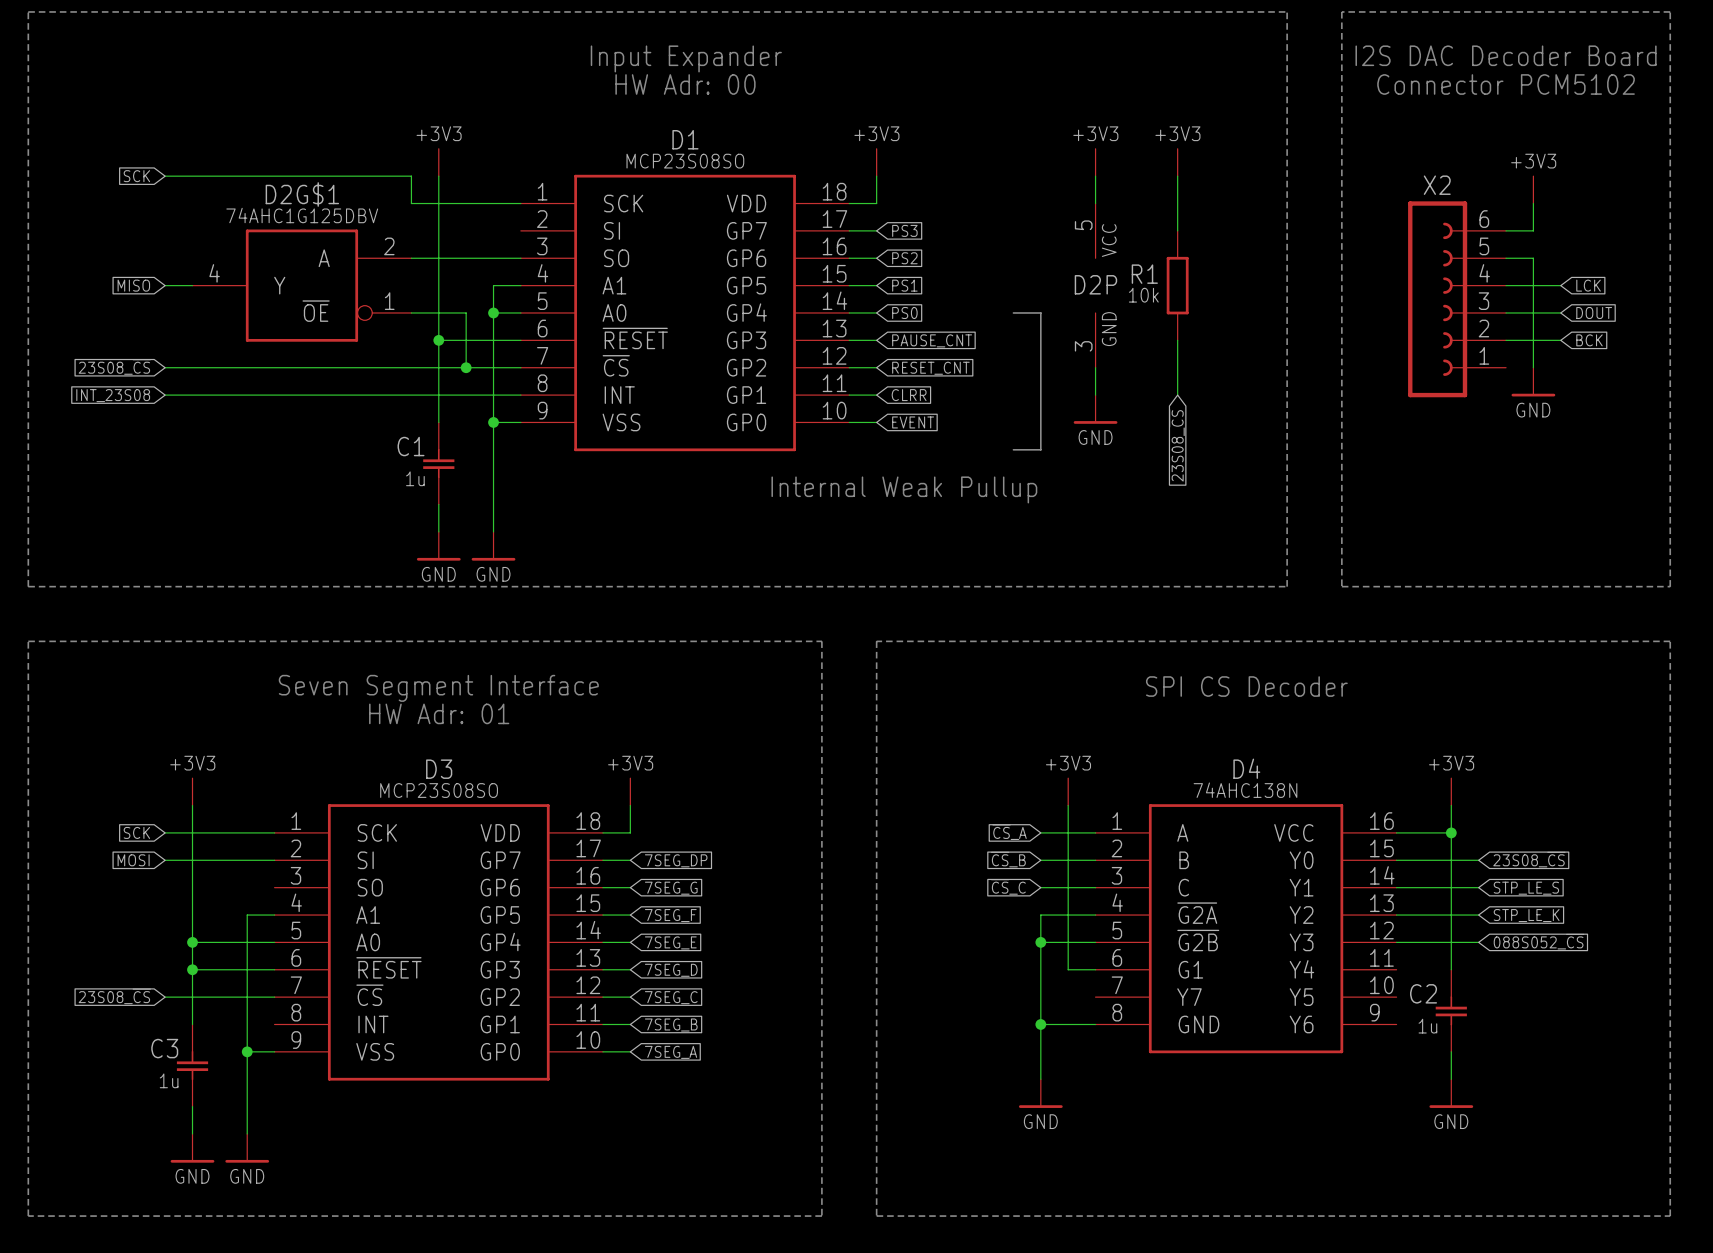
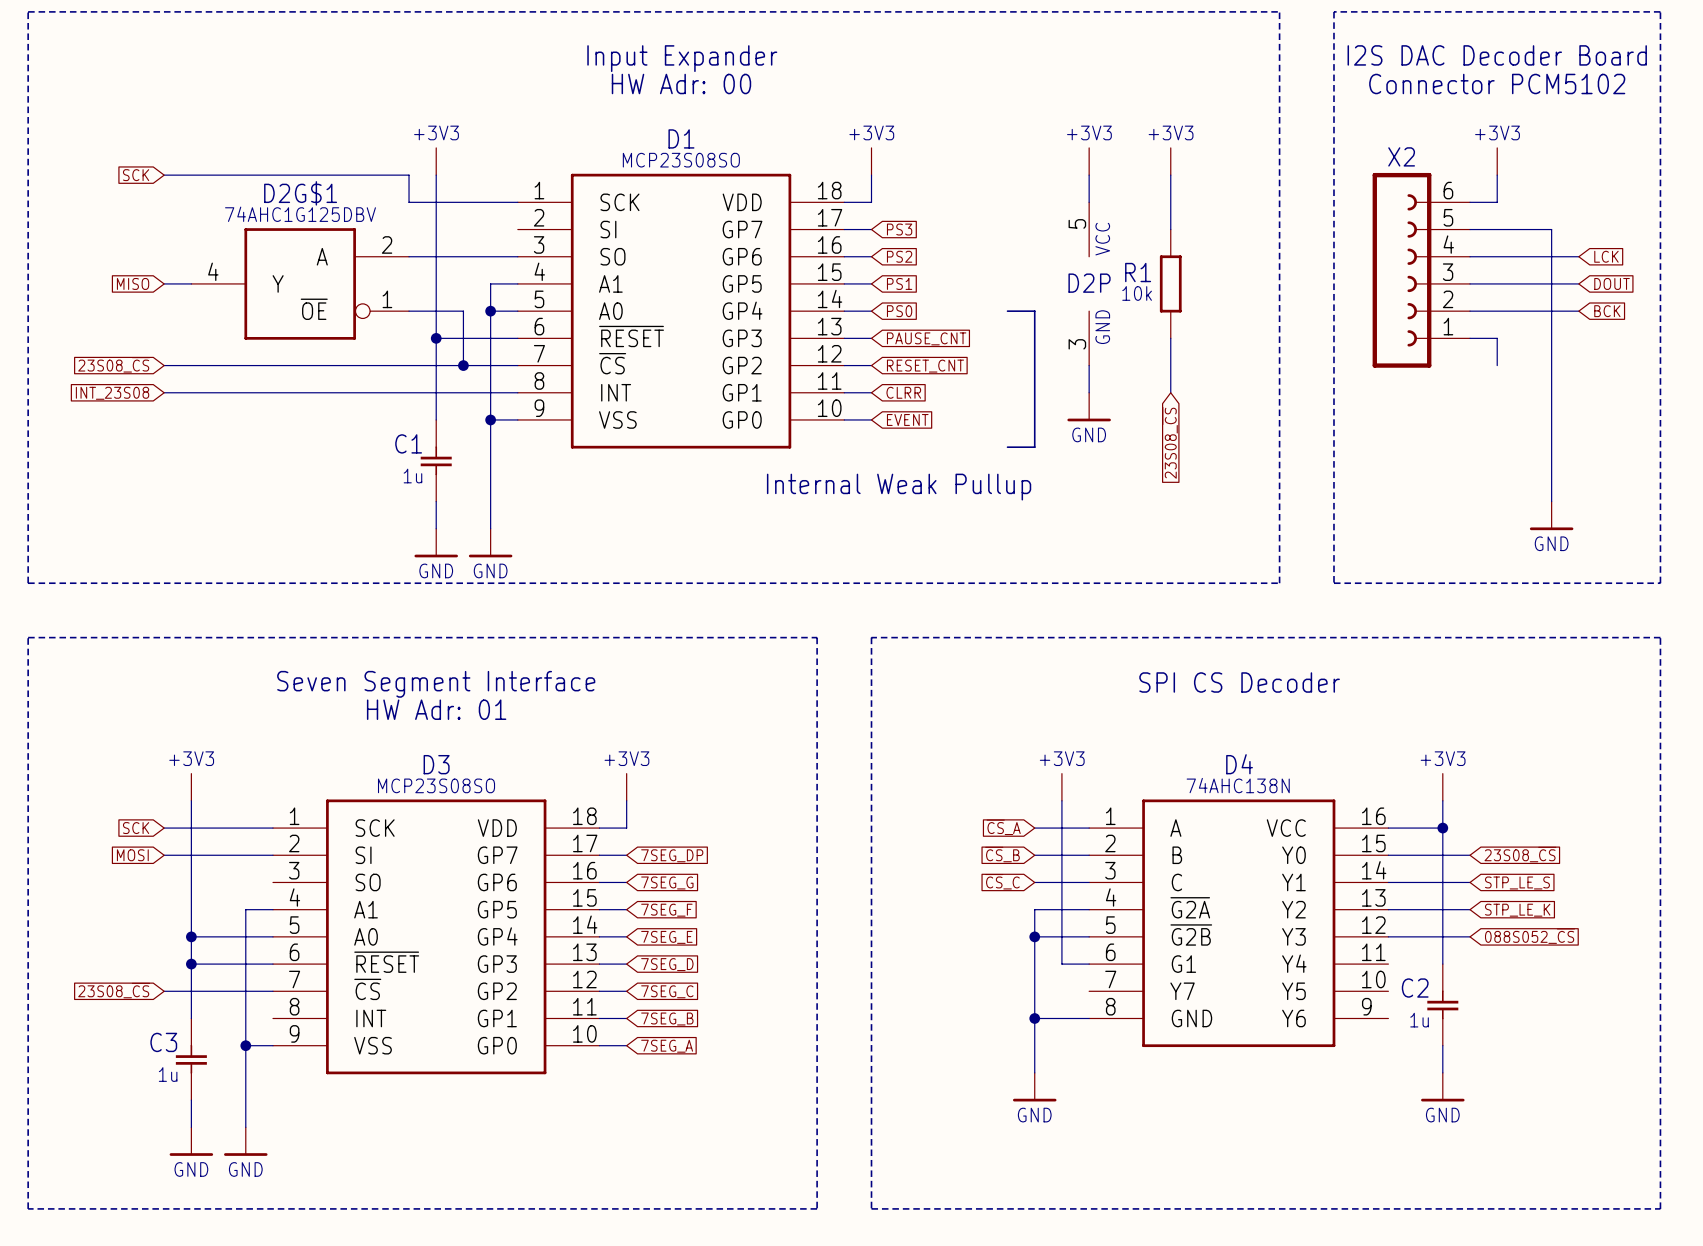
wire: none -> (1497, 175) (1497, 202) (1470, 202)
power symbol position: +3V3 (1533, 189) -> +3V3 (1497, 161)
wire: (1533, 203) (1533, 230) -> (1551, 501) (1551, 229) (1524, 229)
wire: (1533, 258) (1533, 367) -> (1524, 256) (1578, 256)
wire: none -> (1551, 283) (1578, 283)
global label position: LCK (1588, 285) -> LCK (1606, 256)
X2 position: (1457, 299) -> (1421, 270)
wire: none -> (1551, 311) (1578, 311)
global label position: DOUT (1594, 312) -> DOUT (1612, 283)
wire: none -> (1470, 338) (1497, 338) (1497, 365)
wire: (1506, 340) (1560, 340) -> none
global label position: BCK (1589, 340) -> BCK (1607, 311)
power symbol position: GND (1533, 382) -> GND (1551, 515)

